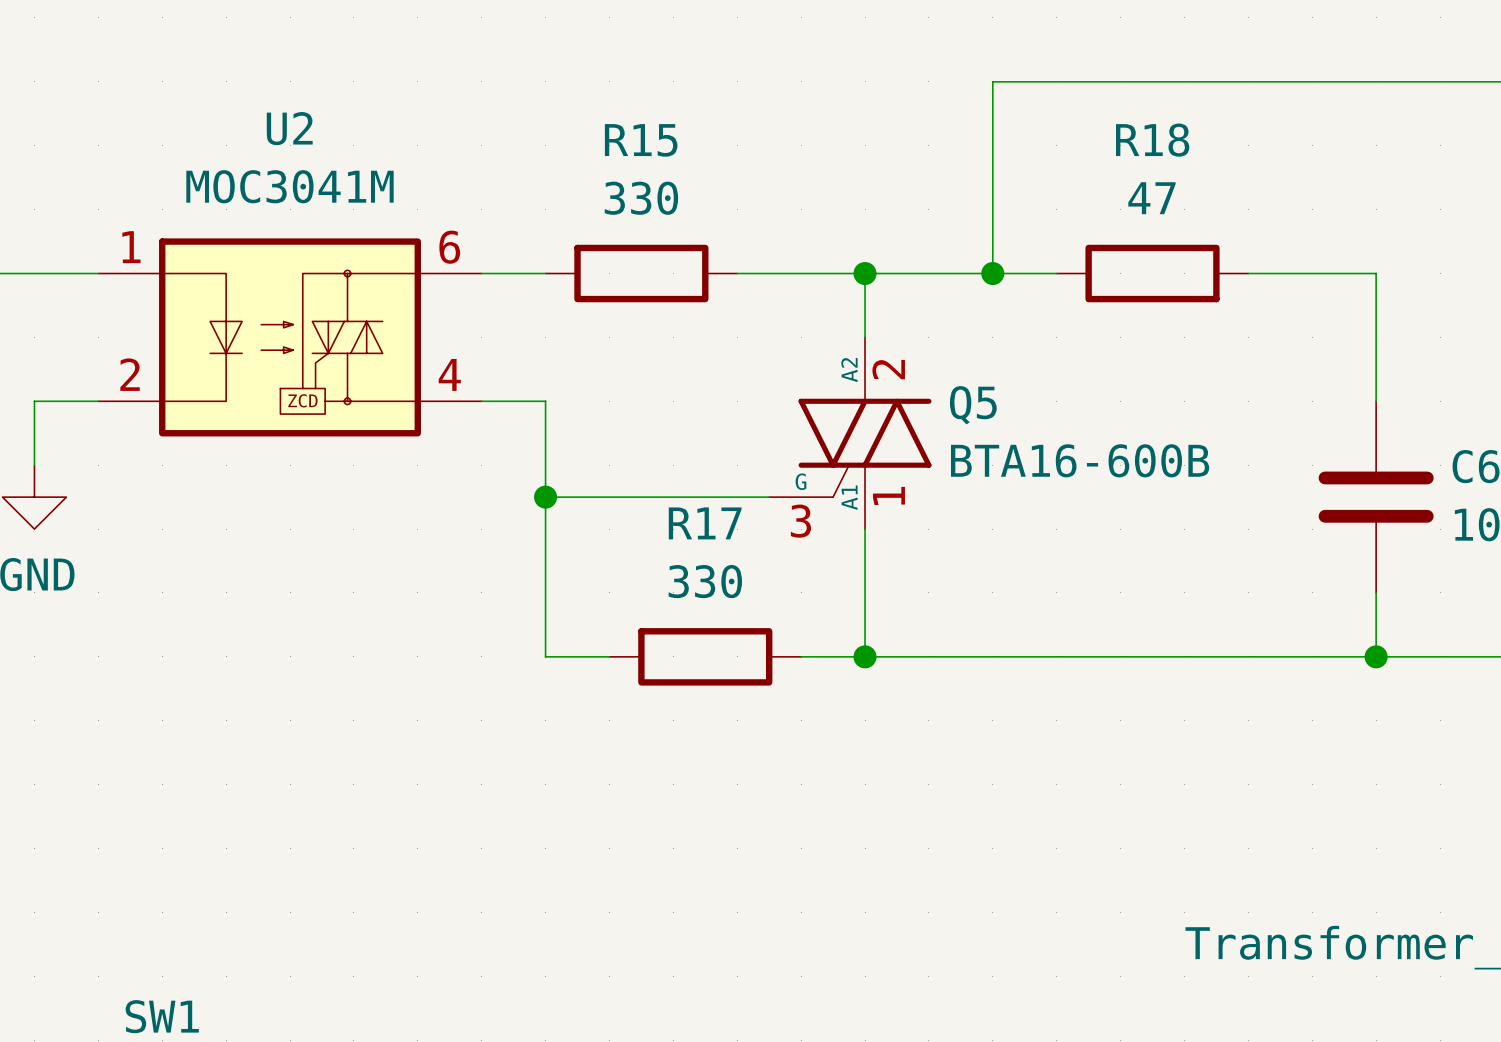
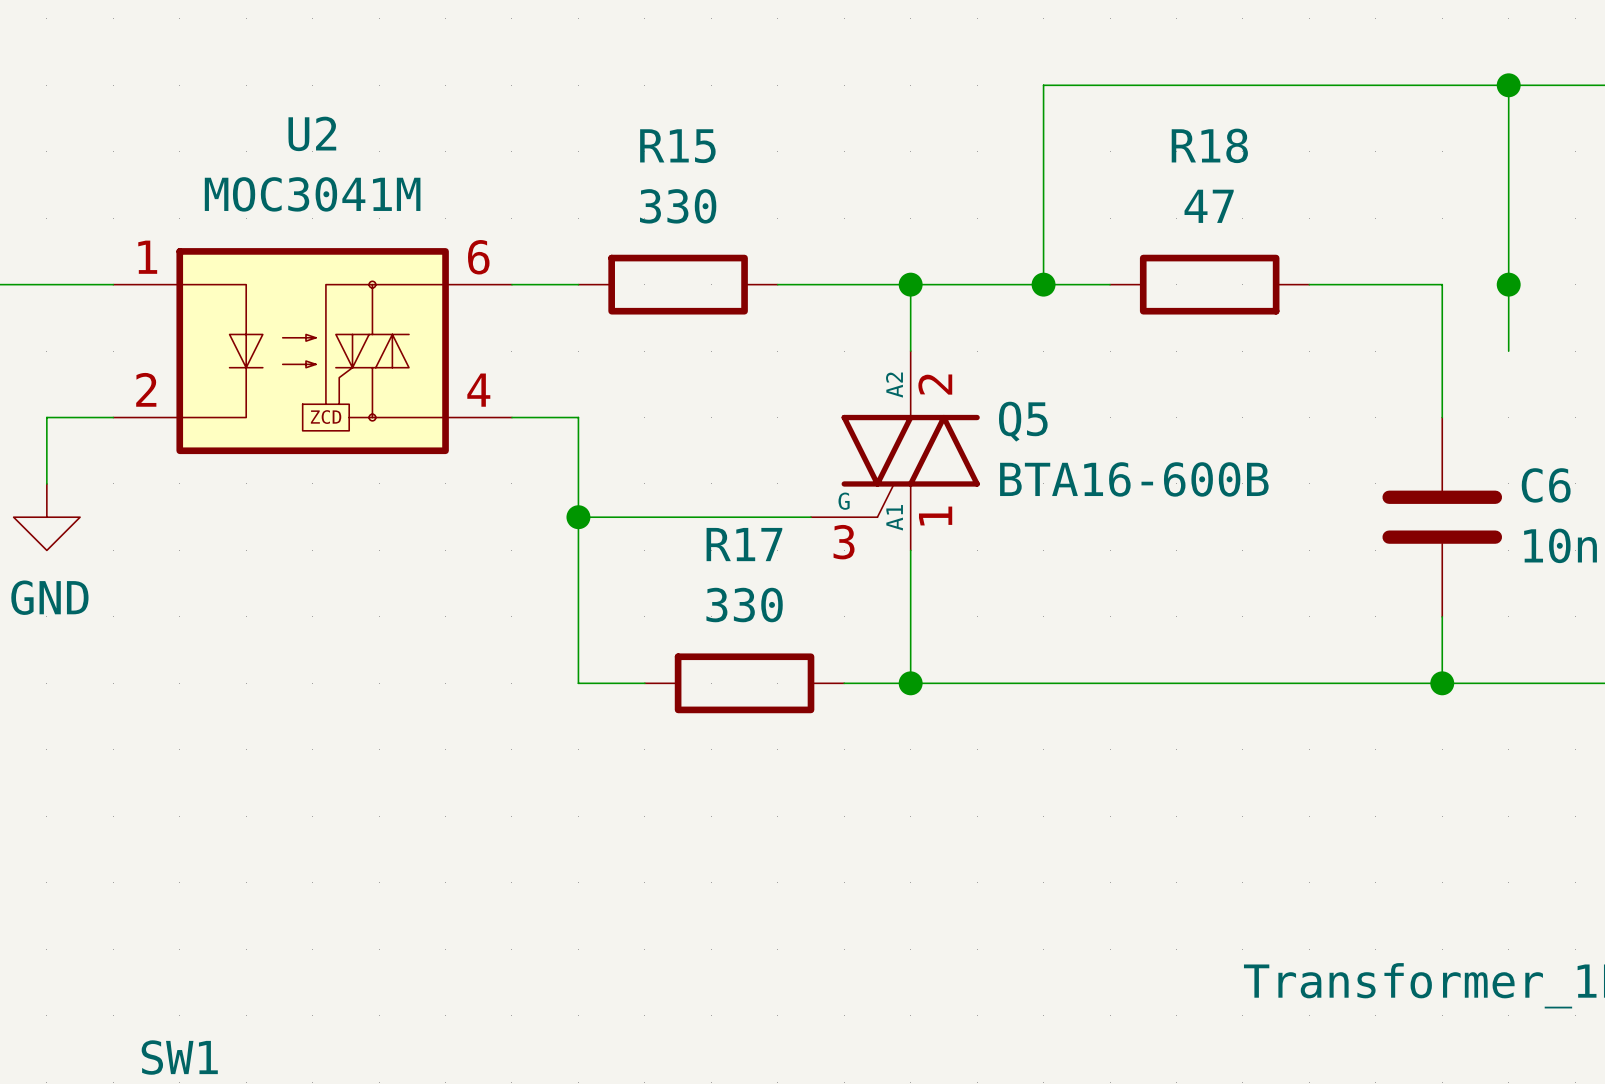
wire: none -> (1508, 85) (1508, 351)
junction: none -> (1508, 85)
junction: none -> (1508, 284)

